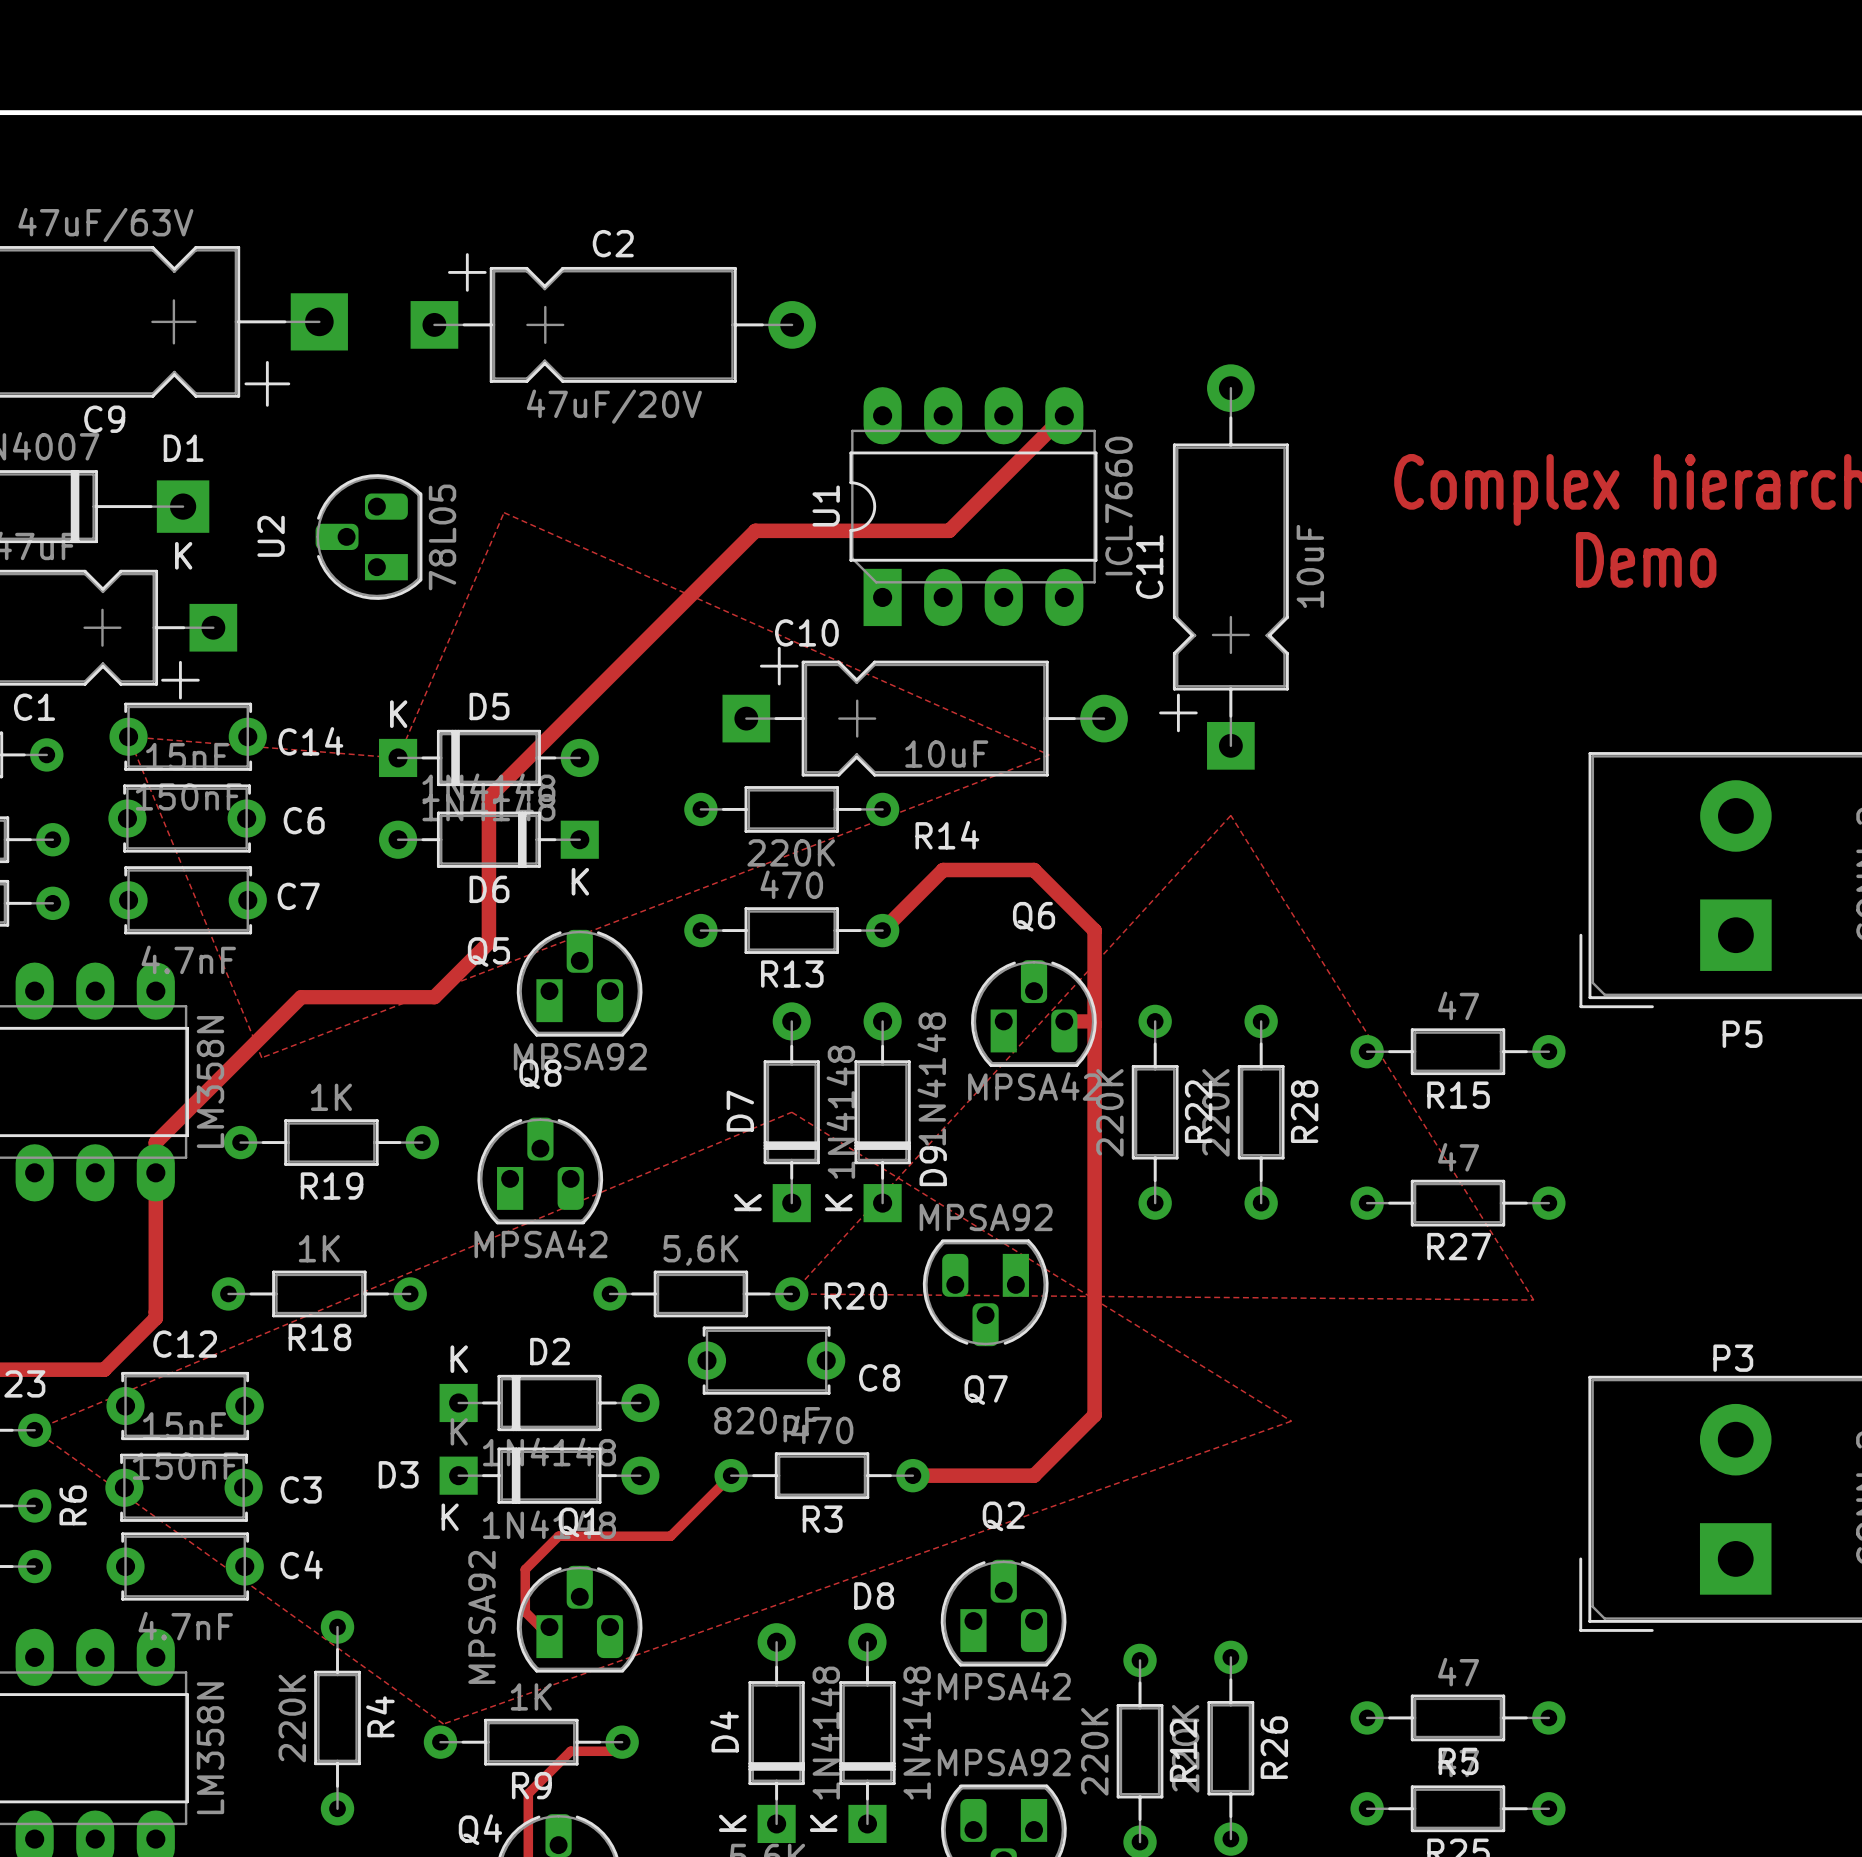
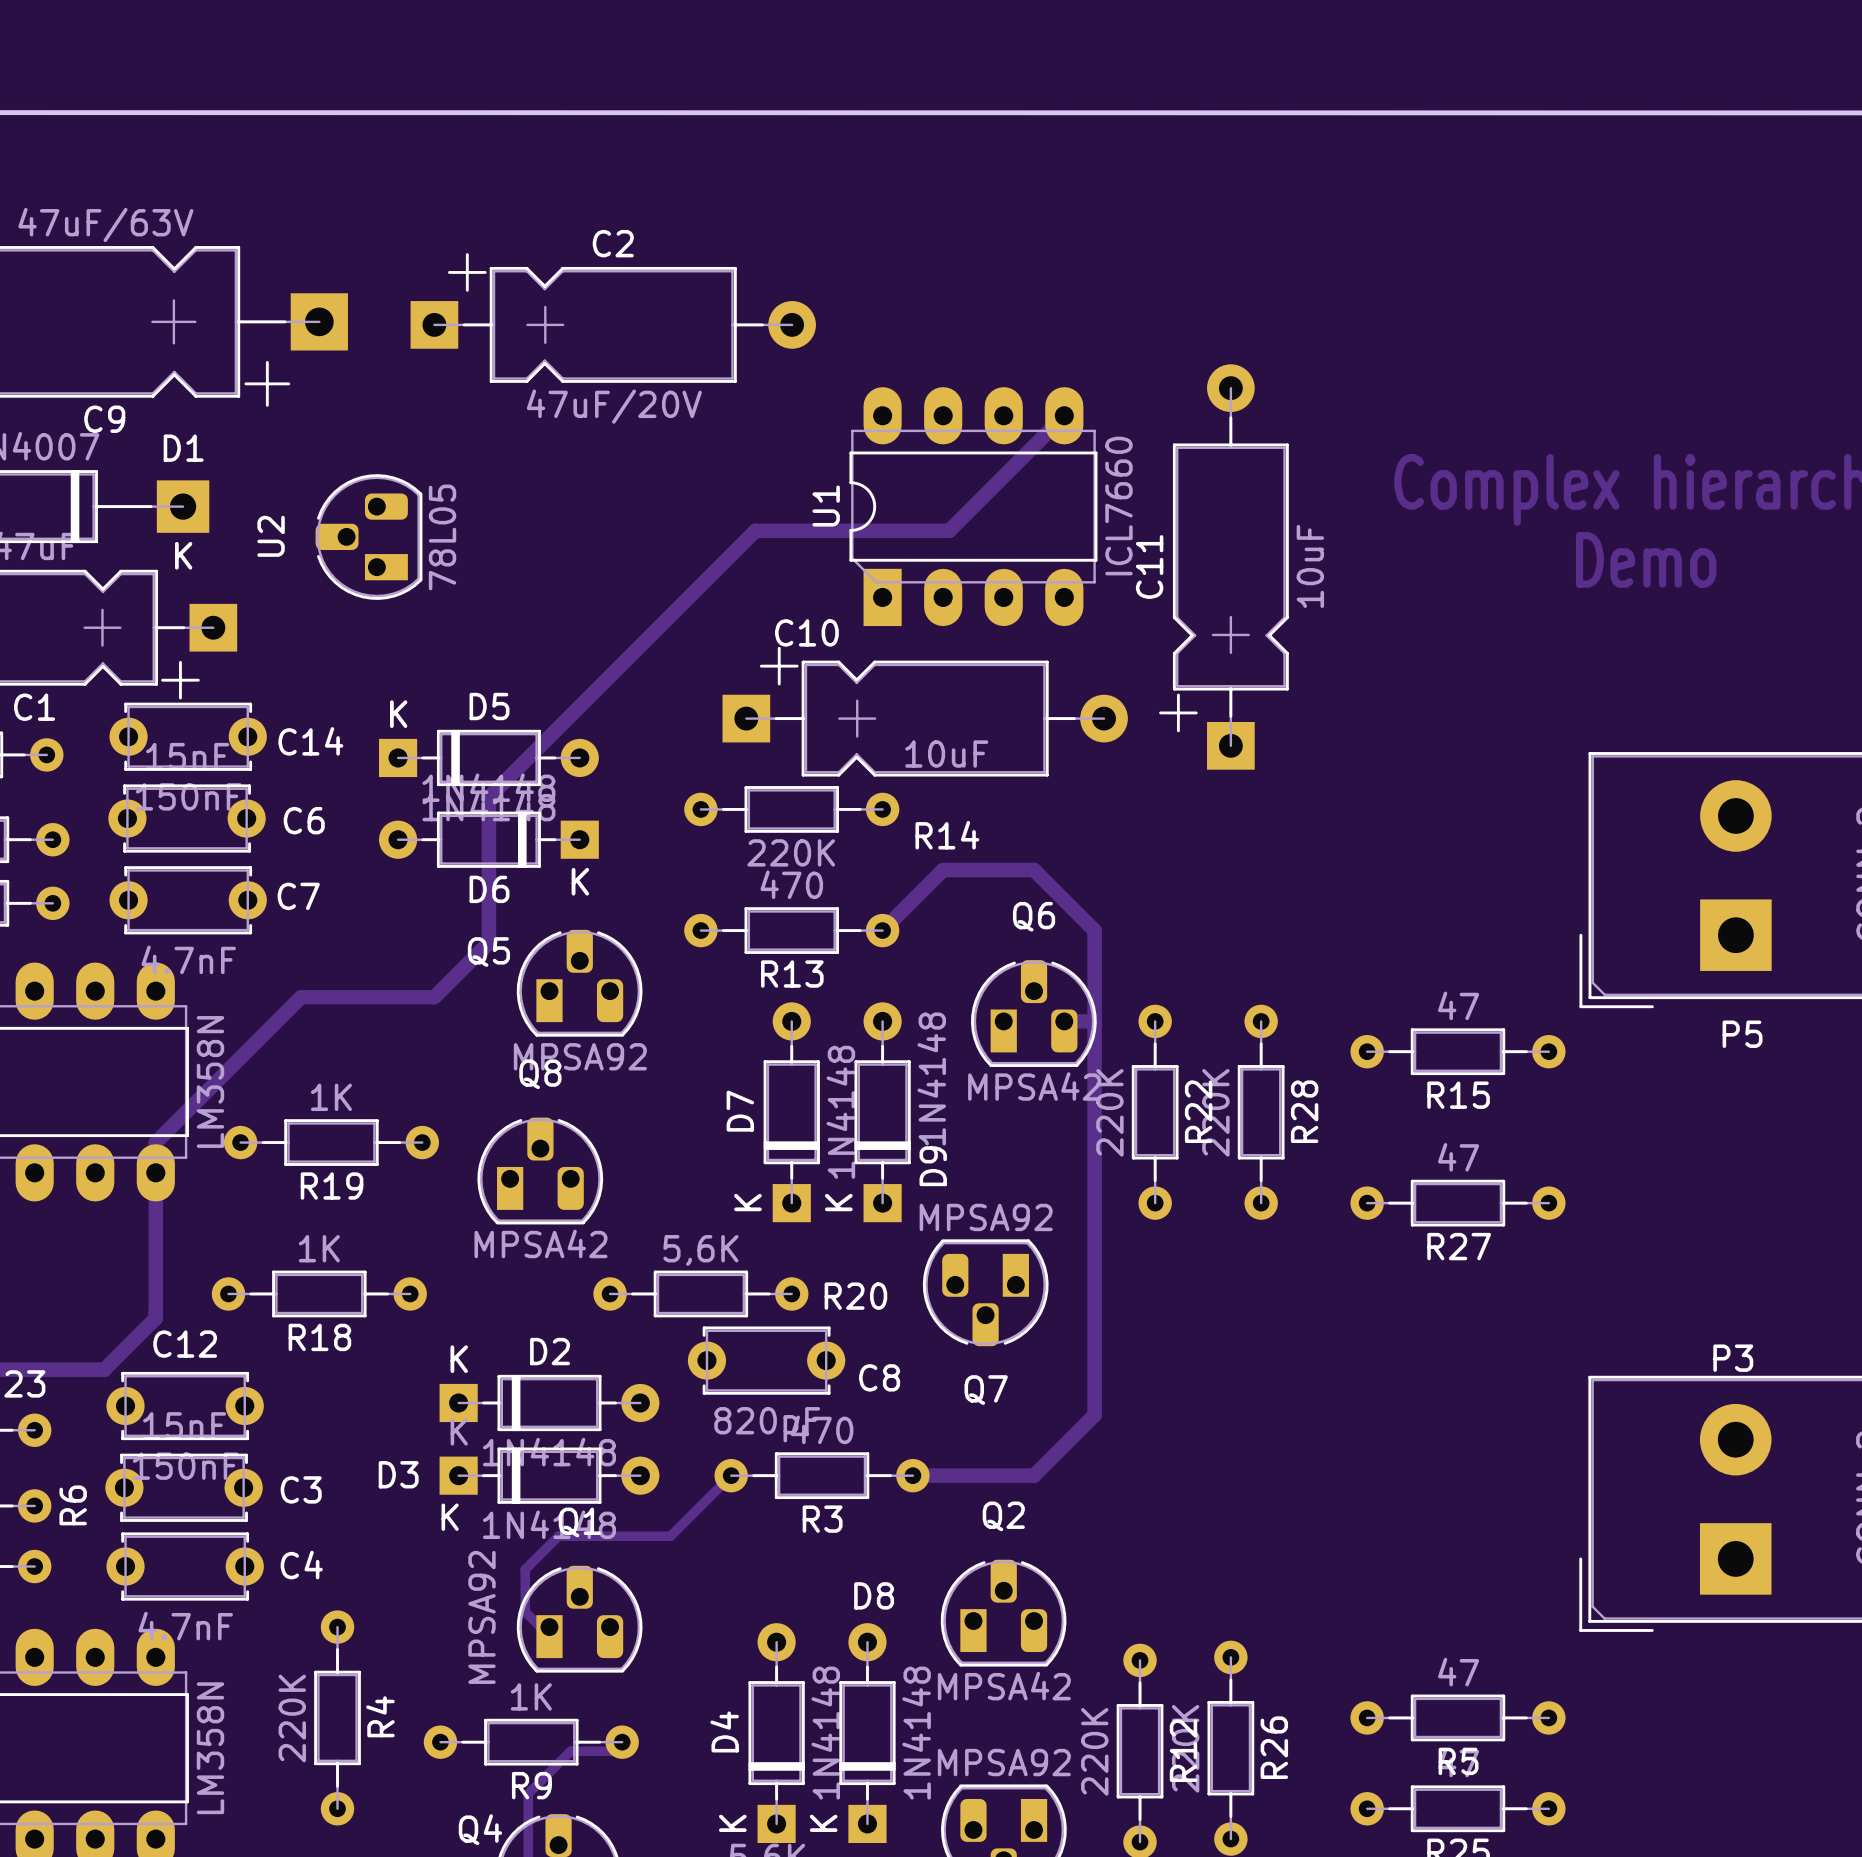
zone outline: (504, 512) (1049, 754) (261, 1057) (128, 736) (398, 757) (504, 512) -> none
zone outline: (1230, 815) (1533, 1300) (791, 1293) (1230, 815) -> none
zone outline: (791, 1112) (1291, 1421) (443, 1723) (34, 1430) (791, 1112) -> none

